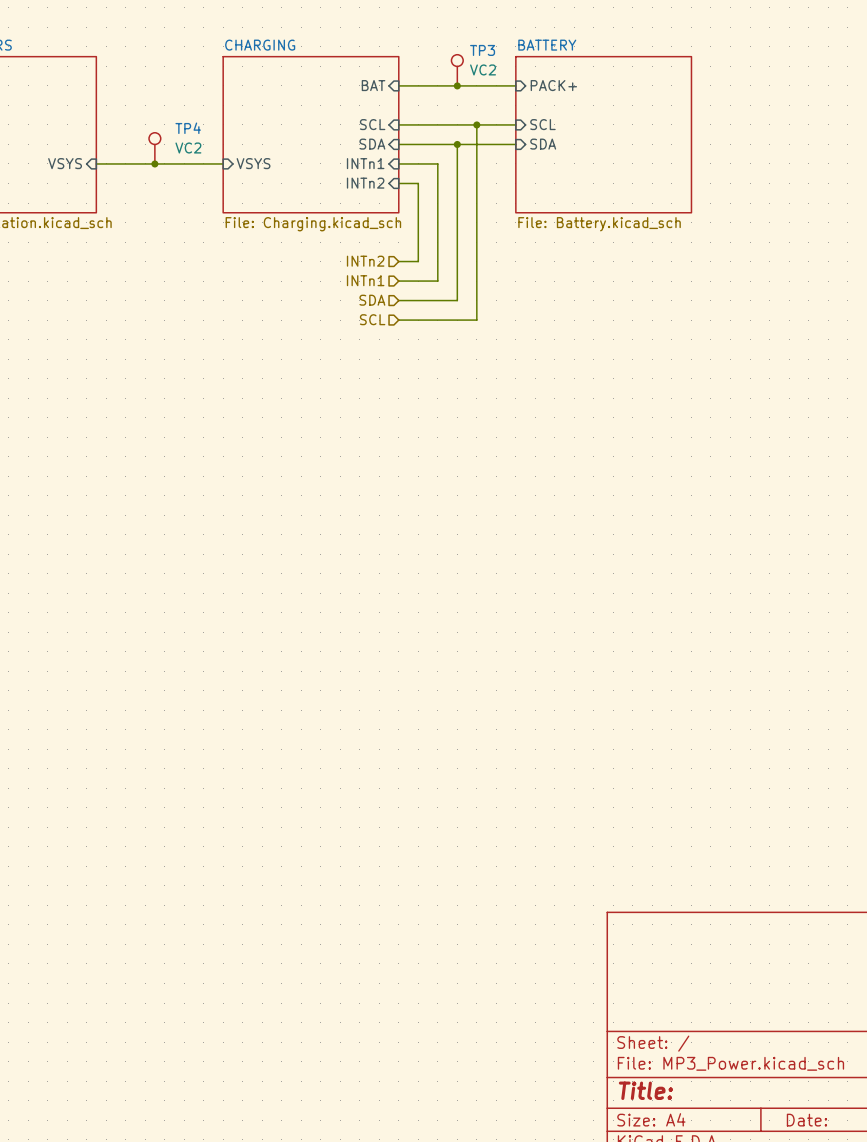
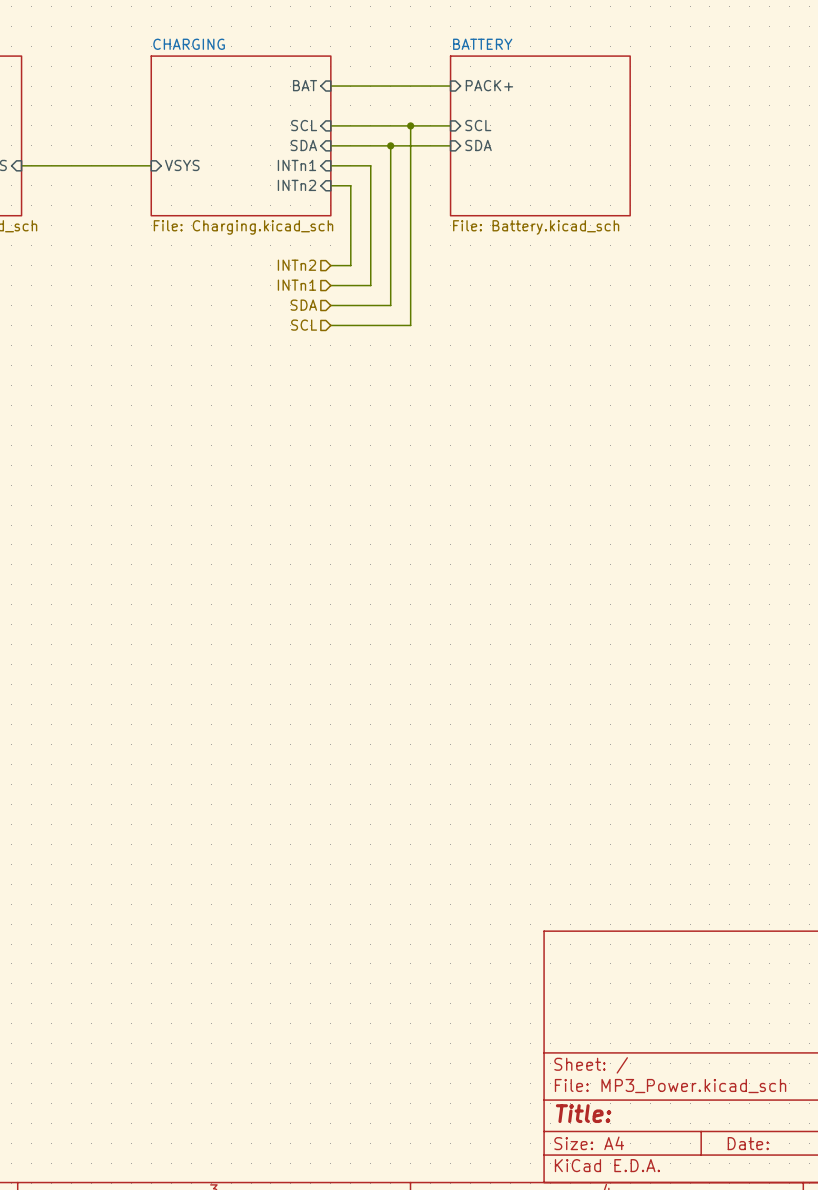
TP3: VC2 (457, 70) -> none
junction: (457, 85) -> none
TP4: VC2 (154, 148) -> none
junction: (154, 163) -> none

